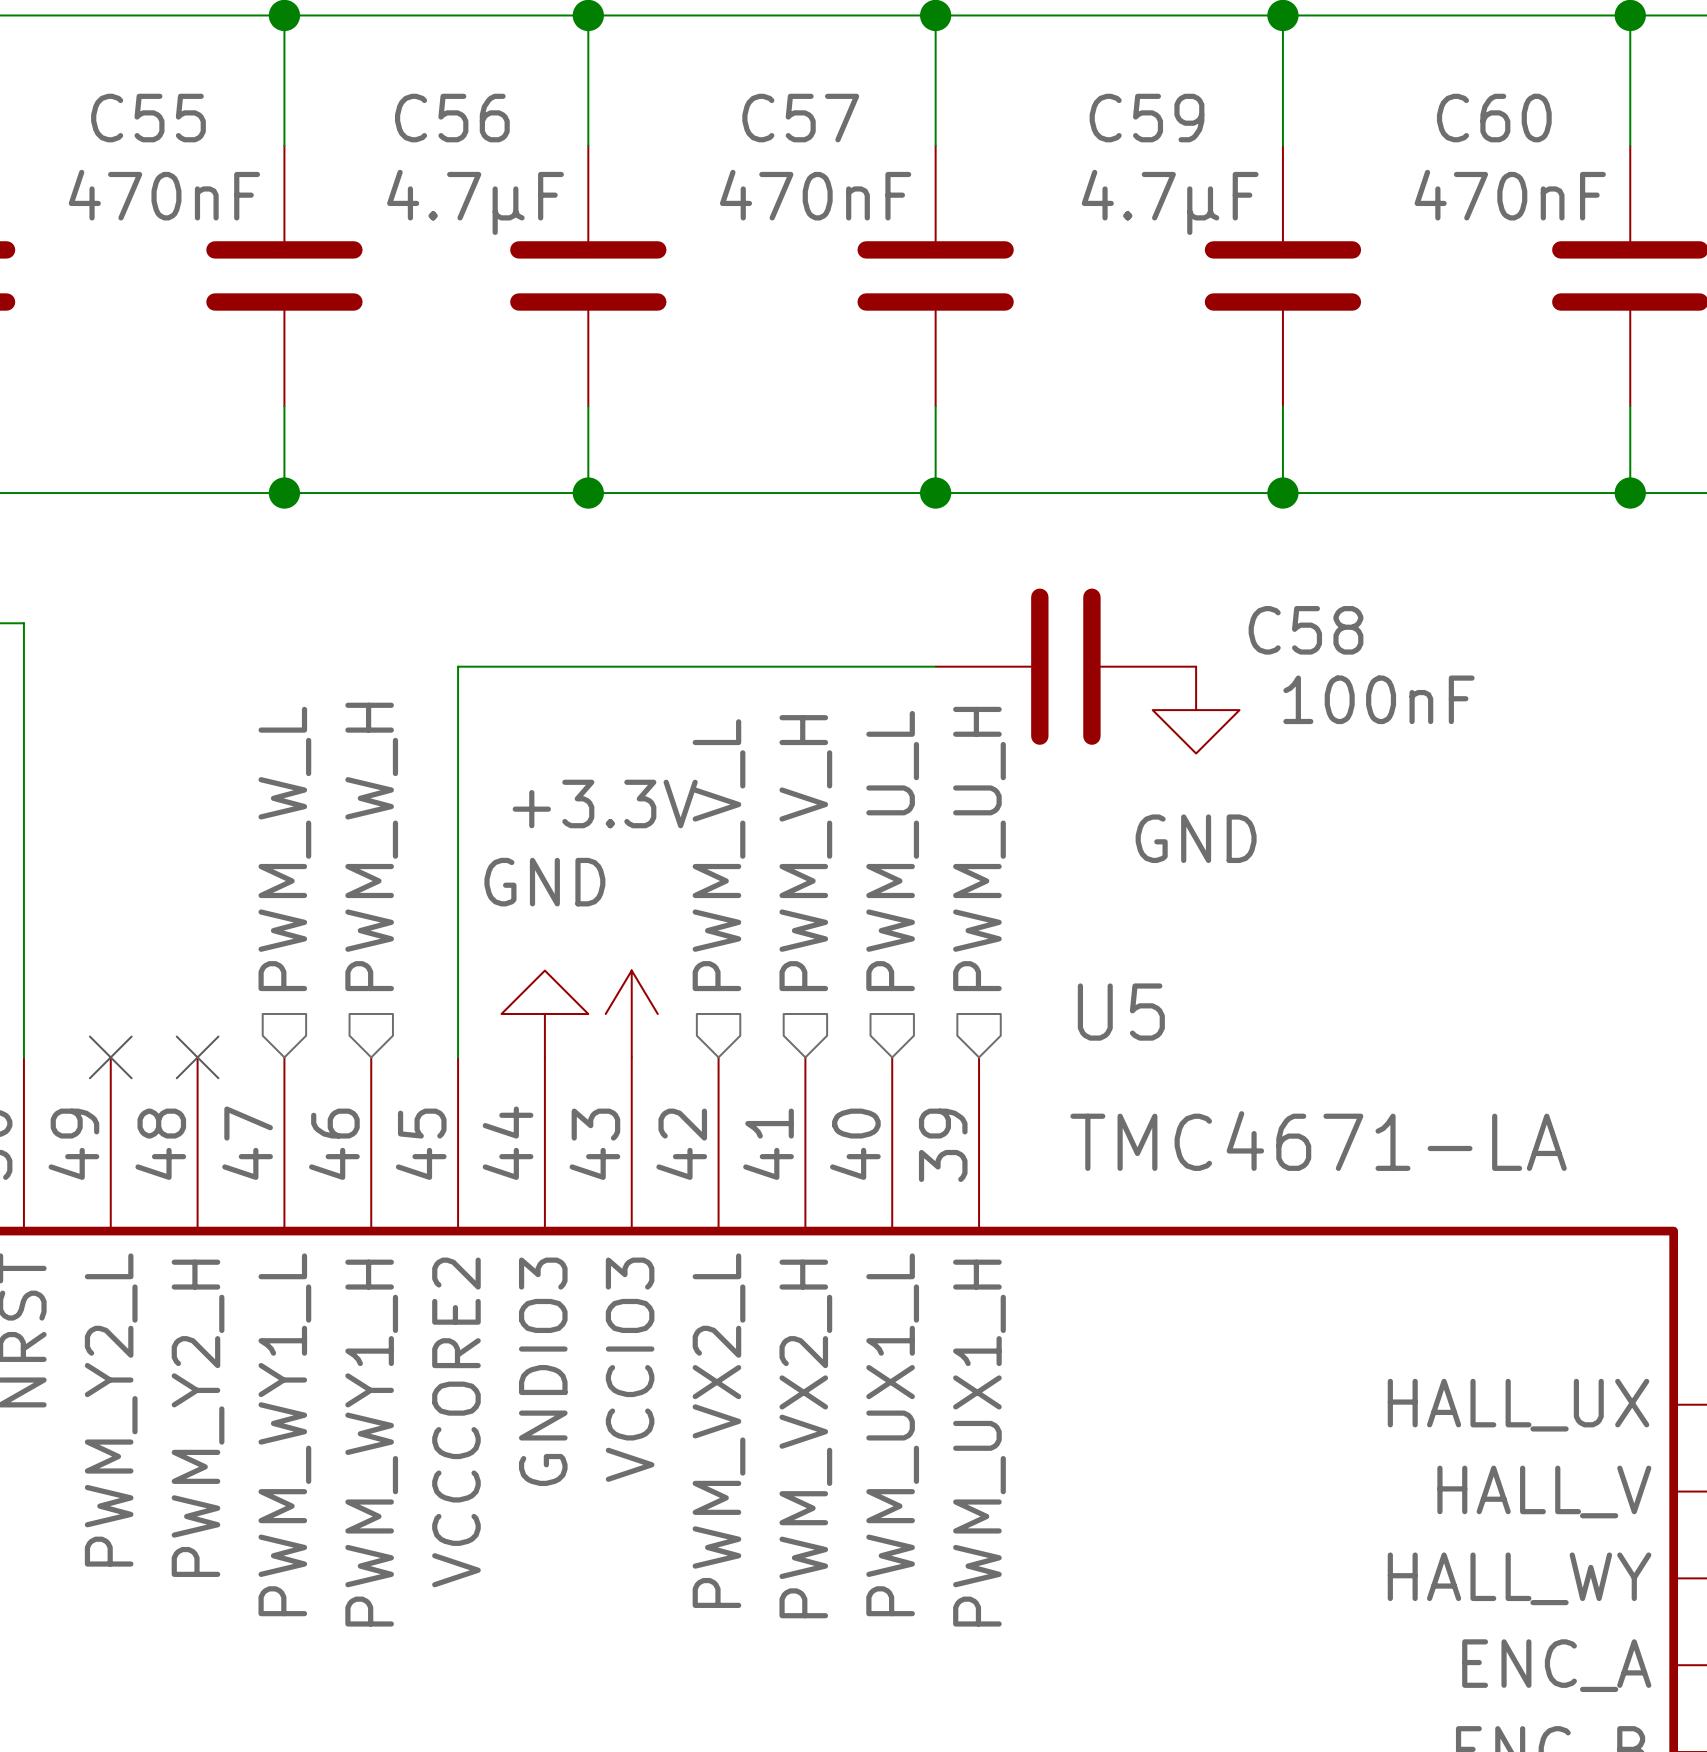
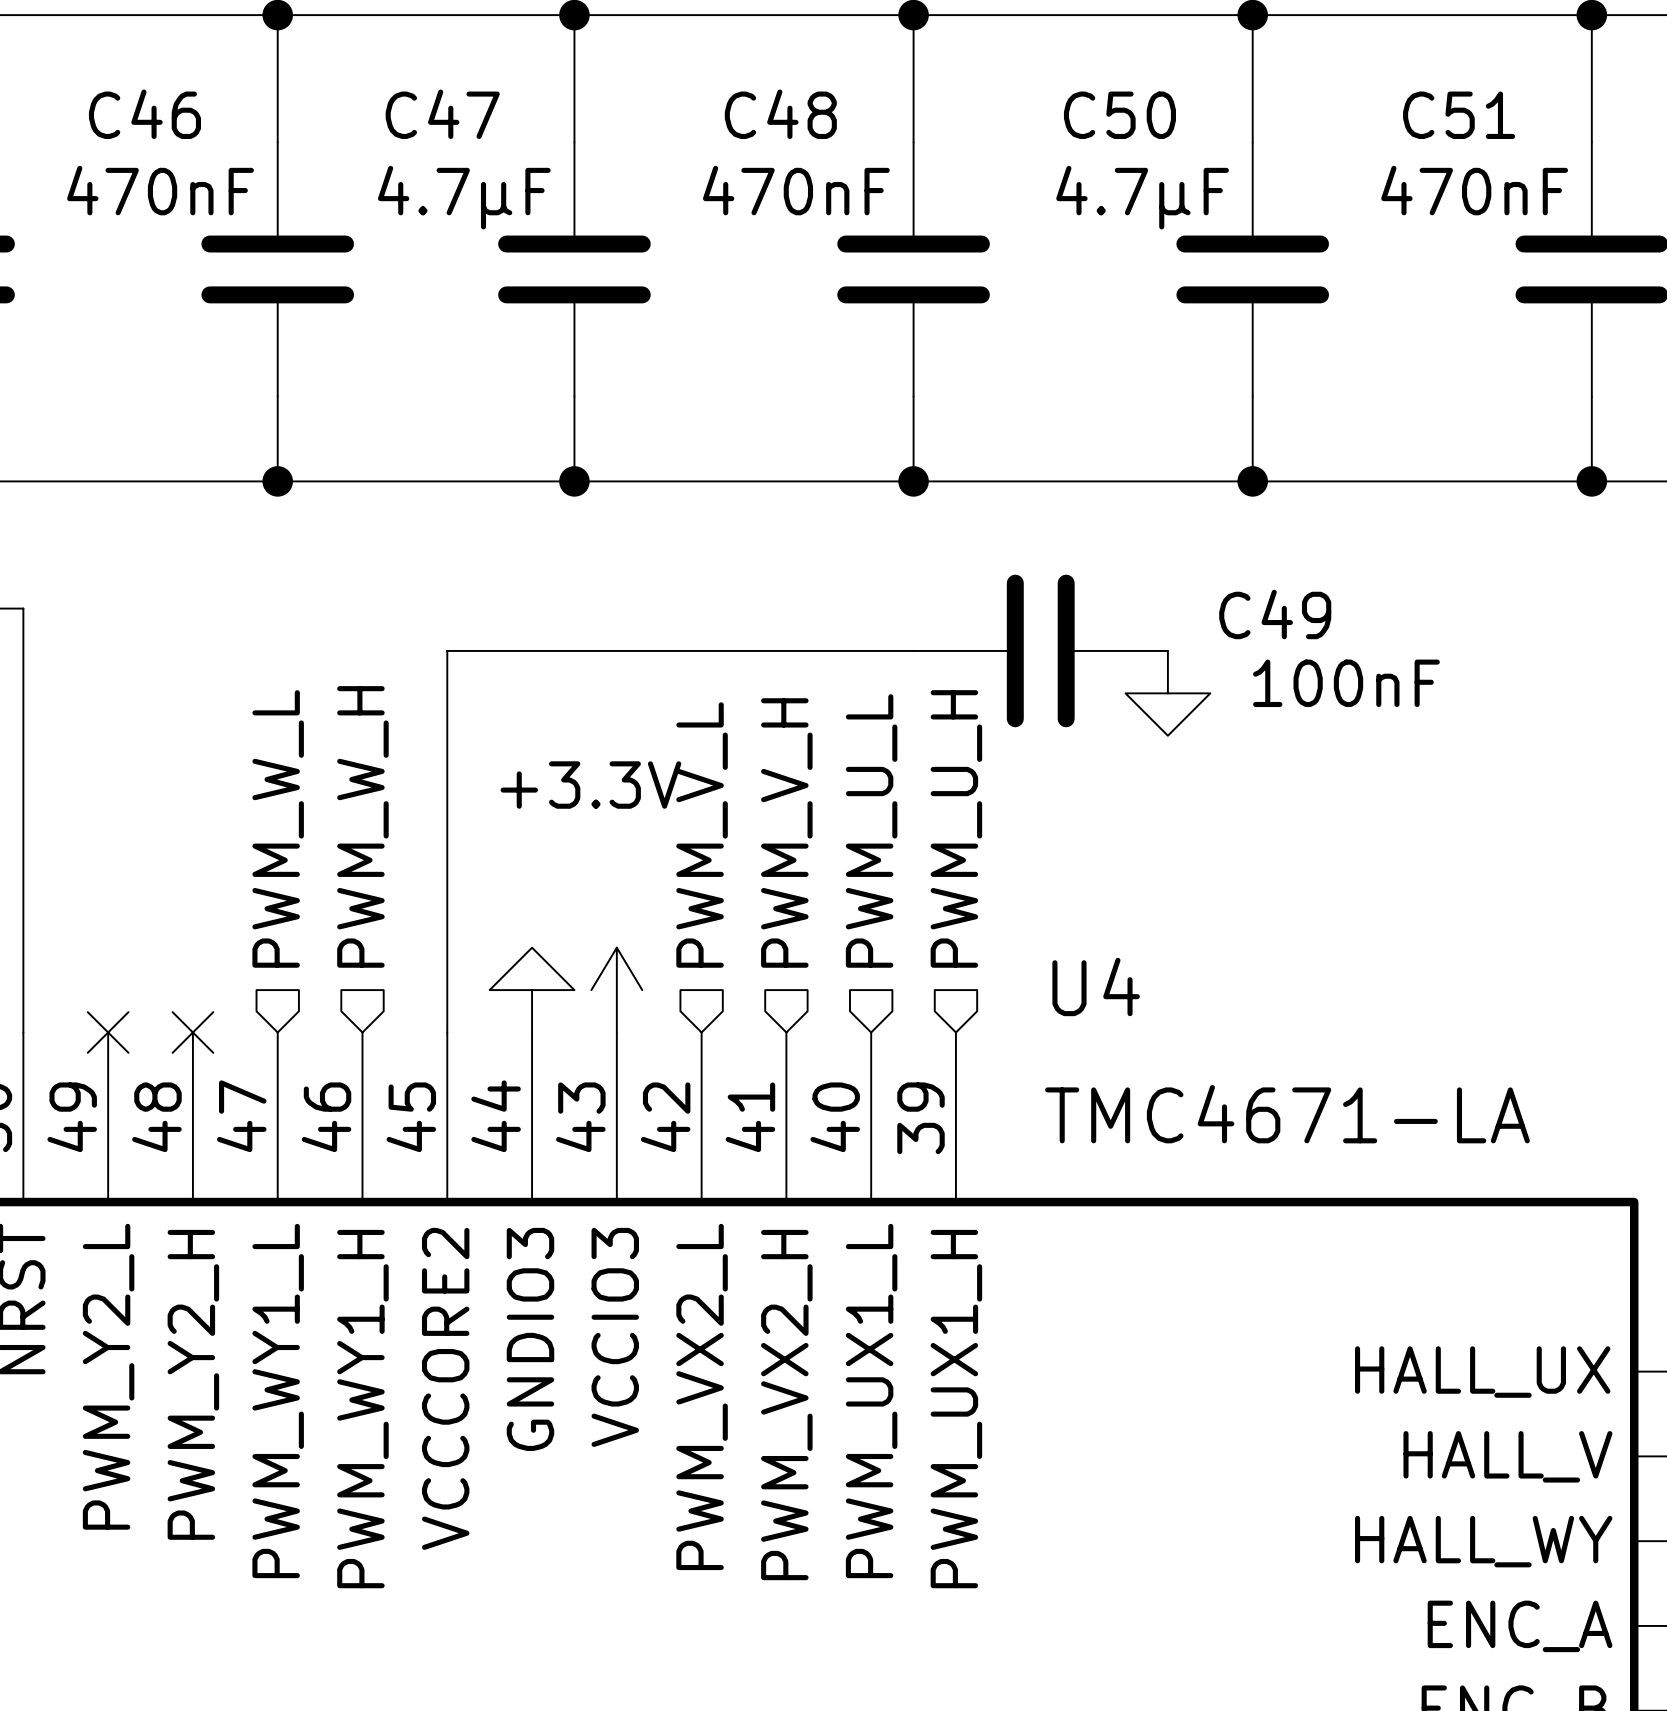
C55 name: C55 (148, 118) -> C46 (144, 114)
C56 name: C56 (452, 118) -> C47 (442, 114)
C57 name: C57 (800, 118) -> C48 (780, 114)
C59 name: C59 (1147, 118) -> C50 (1119, 115)
C60 name: C60 (1494, 118) -> C51 (1459, 115)
C58 name: C58 (1306, 630) -> C49 (1275, 614)
power symbol text: GND (1196, 838) -> none
power symbol text: GND (544, 882) -> none
U5 name: U5 (1121, 1012) -> U4 (1096, 986)

